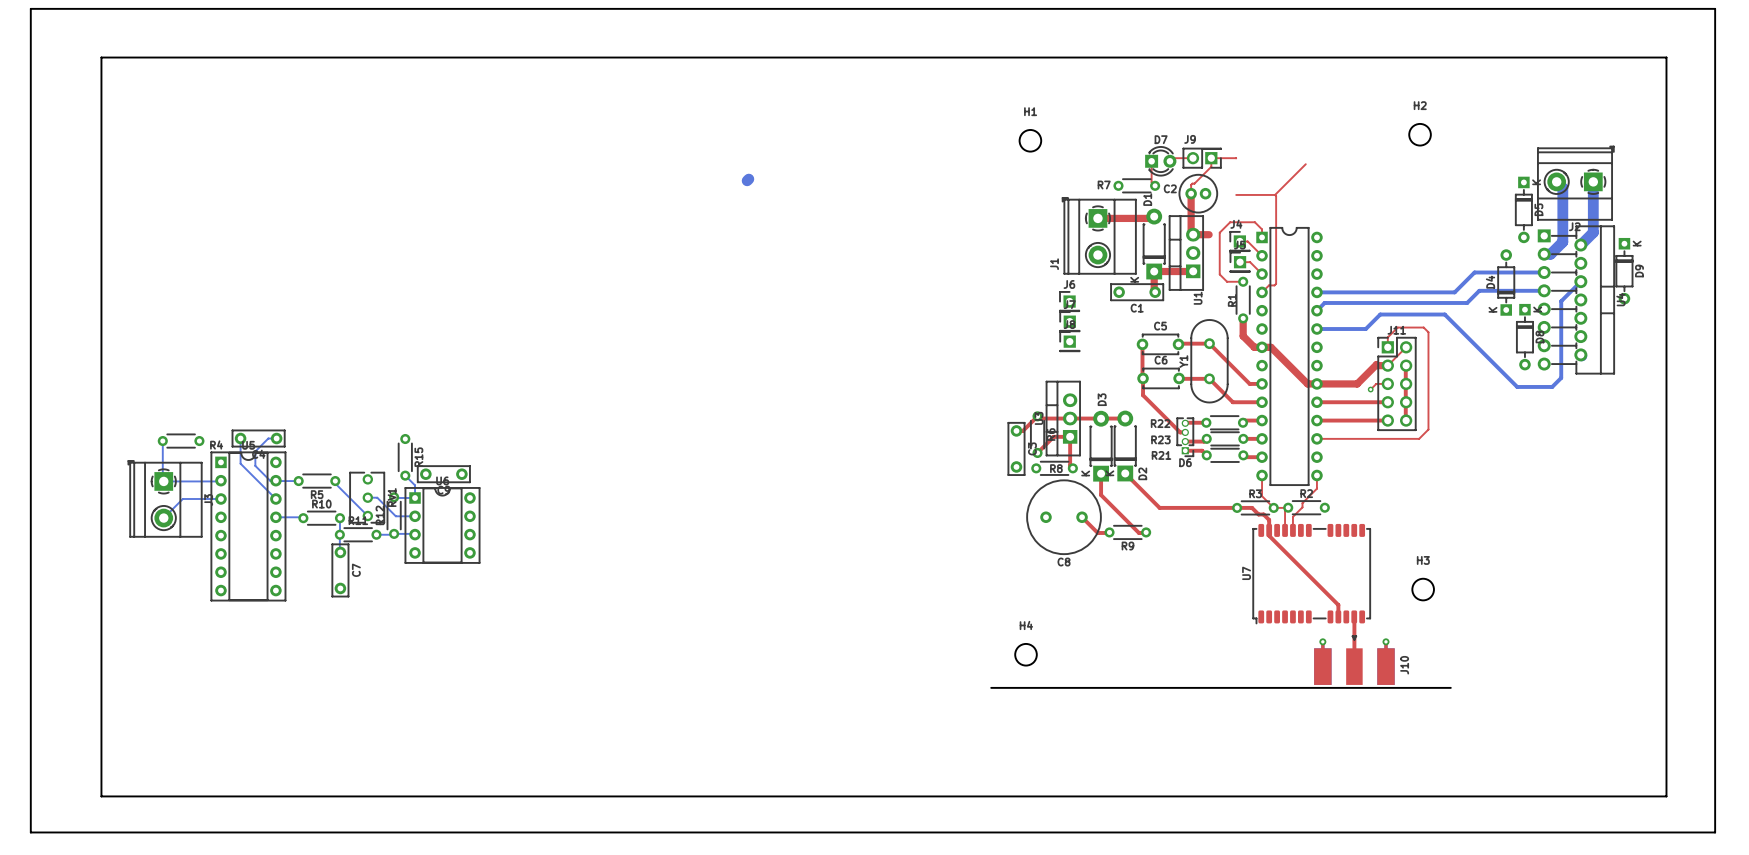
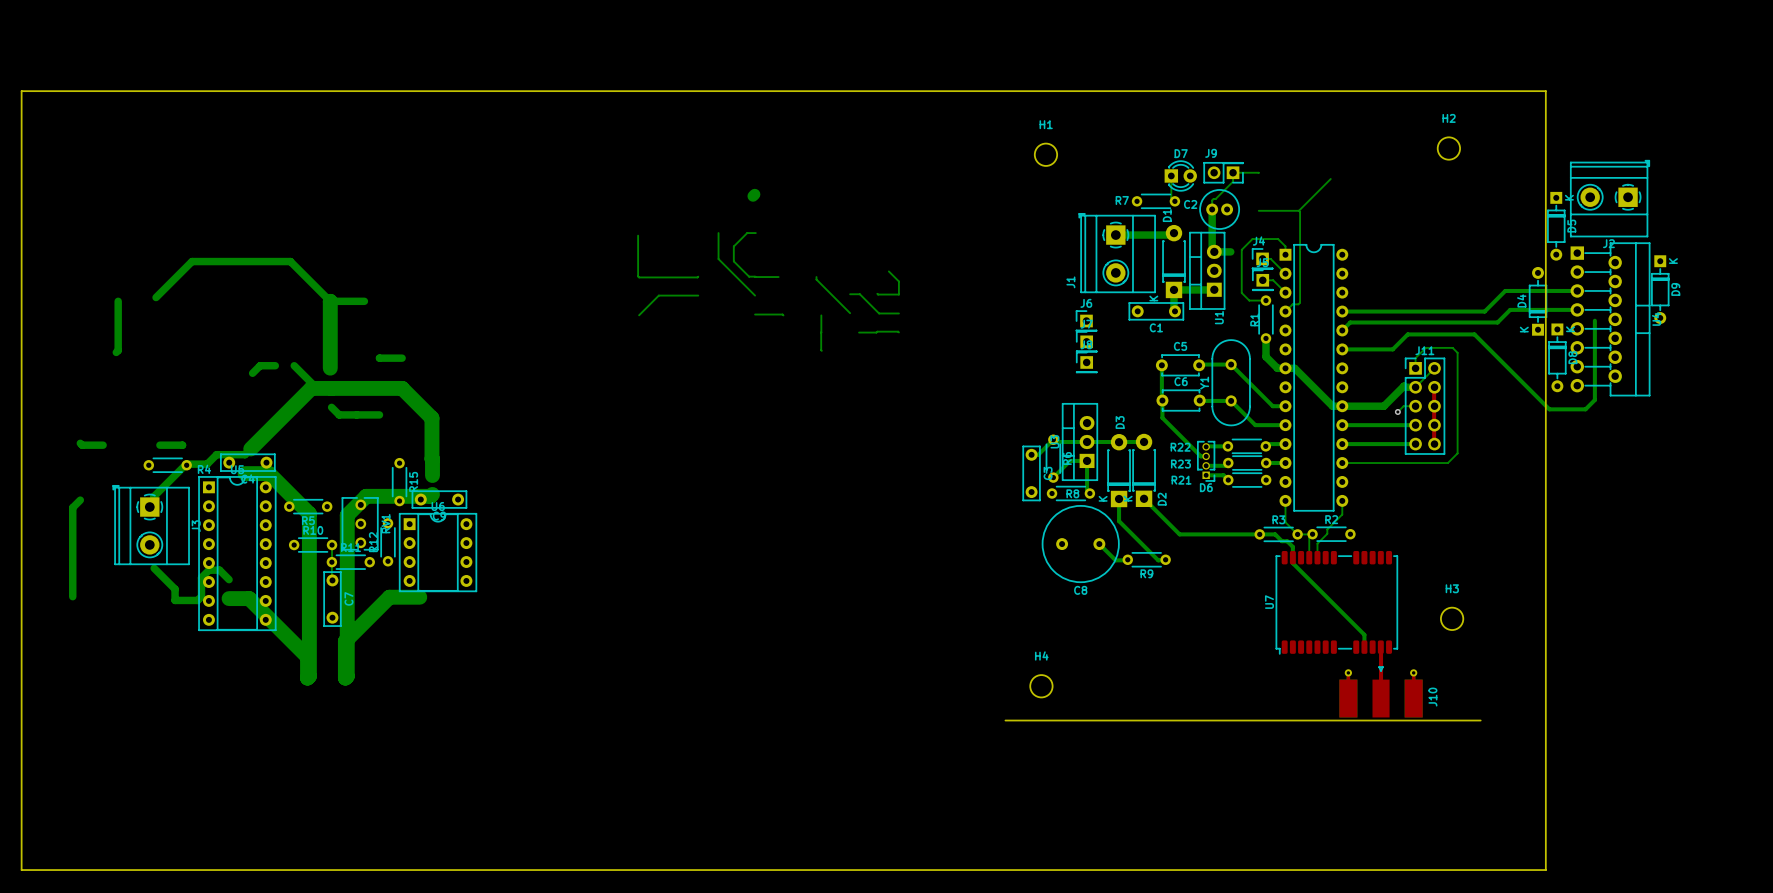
board edge: (101, 57) (1666, 57) (1666, 796) (101, 796) (101, 57) -> none
top track: (1193, 158) (1173, 158) (1169, 161) -> none
top track: (1236, 158) (1211, 158) (1211, 166) (1191, 184) (1191, 232) (1193, 234) (1209, 234) -> none
bottom track: none -> (1258, 172) (1233, 172) (1233, 181) (1212, 200) (1212, 249) (1214, 251) (1230, 251)
top track: (1151, 161) (1151, 182) (1155, 185) -> none
bottom track: none -> (1171, 175) (1171, 197) (1174, 201)
top track: (1305, 164) (1275, 194) -> none
bottom track: none -> (1330, 179) (1298, 210)
bottom track: (1556, 181) (1562, 188) (1562, 242) (1550, 254) (1544, 254) -> none
bottom track: (1593, 181) (1593, 232) (1580, 245) -> none
top track: (1236, 194) (1275, 194) -> none
bottom track: none -> (1258, 210) (1298, 210)
top track: (1275, 194) (1276, 283) (1268, 285) (1262, 292) -> none
bottom track: none -> (1298, 210) (1300, 302) (1292, 304) (1285, 311)
bottom track: none -> (718, 233) (718, 259) (755, 295)
bottom track: none -> (755, 233) (747, 233) (733, 246) (733, 261) (749, 276) (778, 277)
top track: (1154, 216) (1152, 218) (1097, 218) -> none
bottom track: none -> (1173, 233) (1172, 235) (1115, 235)
bottom track: none -> (638, 235) (639, 277) (698, 276)
top track: (1262, 237) (1262, 229) (1254, 222) (1230, 222) (1219, 232) (1219, 274) (1227, 281) (1243, 281) -> none
bottom track: none -> (1285, 254) (1285, 246) (1278, 239) (1252, 239) (1241, 249) (1241, 292) (1249, 300) (1265, 300)
top track: (1239, 241) (1247, 241) (1262, 255) -> none
bottom track: none -> (1262, 258) (1270, 258) (1285, 273)
bottom track: none -> (888, 271) (898, 281) (898, 294) (877, 293)
bottom track: none -> (816, 277) (816, 279) (850, 313)
top track: (1240, 262) (1250, 262) (1262, 274) -> none
bottom track: none -> (1262, 280) (1273, 280) (1285, 292)
top track: (1193, 271) (1154, 271) (1155, 292) -> none
bottom track: none -> (1214, 289) (1173, 289) (1174, 311)
bottom track: none -> (850, 294) (859, 294) (879, 313) (898, 313)
bottom track: none -> (698, 295) (658, 295) (639, 315)
bottom track: none -> (156, 297) (192, 261) (290, 261) (330, 301) (364, 301)
bottom track: (1580, 281) (1561, 301) -> none
bottom track: none -> (118, 301) (118, 350) (116, 352)
bottom track: none -> (330, 301) (330, 368)
bottom track: none -> (755, 314) (783, 315)
bottom track: none -> (821, 315) (821, 350)
bottom track: none -> (898, 332) (859, 332)
top track: (1243, 318) (1243, 336) (1254, 347) (1271, 347) (1307, 383) (1357, 383) (1376, 364) (1387, 365) (1406, 347) -> none
bottom track: none -> (1265, 338) (1265, 356) (1277, 368) (1294, 368) (1332, 406) (1383, 406) (1404, 386) (1415, 387) (1434, 368)
bottom track: none -> (379, 358) (402, 358)
bottom track: none -> (275, 365) (260, 365) (252, 373)
bottom track: none -> (294, 365) (316, 388) (331, 388)
top track: (1142, 344) (1143, 395) (1180, 432) (1185, 432) -> none
bottom track: none -> (1161, 365) (1162, 417) (1200, 456) (1206, 456)
top track: (1178, 344) (1209, 343) (1249, 383) (1262, 383) -> none
bottom track: none -> (1199, 365) (1231, 364) (1272, 406) (1285, 406)
top track: (1387, 347) (1387, 337) (1397, 327) (1423, 327) (1428, 332) (1428, 429) (1419, 438) (1316, 438) -> none
bottom track: none -> (1415, 368) (1415, 358) (1425, 347) (1452, 347) (1457, 352) (1457, 453) (1447, 463) (1342, 463)
top track: (1179, 378) (1209, 378) (1232, 402) (1262, 402) -> none
bottom track: none -> (1199, 400) (1231, 400) (1255, 425) (1285, 425)
top track: (1387, 383) (1376, 383) (1370, 389) -> none
bottom track: none -> (1415, 406) (1403, 406) (1397, 412)
bottom track: none -> (331, 407) (339, 414) (379, 414)
top track: (1316, 402) (1387, 403) -> none
bottom track: none -> (1342, 425) (1415, 426)
top track: (1125, 418) (1039, 418) (1037, 416) (1022, 430) (1016, 430) -> none
bottom track: none -> (1144, 442) (1055, 442) (1053, 439) (1038, 454) (1031, 454)
bottom track: none -> (80, 443) (82, 445) (103, 445)
top track: (1262, 420) (1245, 420) (1242, 422) -> none
bottom track: none -> (1285, 444) (1268, 444) (1265, 446)
top track: (1316, 420) (1387, 421) -> none
bottom track: none -> (1342, 444) (1415, 445)
bottom track: none -> (159, 445) (182, 445)
top track: (1206, 422) (1185, 423) -> none
bottom track: none -> (1227, 446) (1206, 446)
bottom track: (240, 438) (240, 463) (275, 498) -> none
bottom track: (276, 438) (268, 438) (255, 451) (255, 465) (270, 480) (298, 481) -> none
top track: (1206, 438) (1204, 441) (1185, 441) -> none
bottom track: none -> (1228, 463) (1225, 465) (1206, 465)
top track: (1243, 438) (1262, 438) -> none
bottom track: none -> (1266, 463) (1285, 463)
bottom track: (162, 441) (163, 481) (220, 480) -> none
bottom track: none -> (245, 473) (269, 473) (309, 513) (309, 676) (307, 678) (307, 656) (249, 598) (229, 598)
bottom track: none -> (432, 475) (431, 418) (402, 388) (311, 388) (245, 454) (216, 454) (207, 464) (186, 464) (154, 496) (154, 511)
top track: (1185, 450) (1202, 450) (1206, 455) -> none
bottom track: none -> (1206, 475) (1223, 475) (1228, 480)
top track: (1037, 452) (1053, 436) (1070, 436) (1070, 465) (1072, 468) -> none
bottom track: none -> (1053, 477) (1070, 460) (1087, 460) (1087, 490) (1089, 493)
top track: (1243, 455) (1245, 457) (1262, 457) -> none
bottom track: none -> (432, 494) (430, 496) (366, 496) (347, 515) (347, 676) (345, 678) (345, 641) (389, 597) (419, 597)
top track: (1101, 473) (1101, 495) (1138, 532) (1146, 532) -> none
bottom track: none -> (1119, 498) (1119, 521) (1158, 560) (1165, 559)
top track: (1125, 473) (1159, 507) (1252, 507) (1258, 514) (1263, 514) (1269, 519) (1269, 535) (1338, 605) (1338, 616) -> none
bottom track: none -> (1144, 498) (1179, 534) (1275, 534) (1281, 541) (1287, 541) (1292, 546) (1292, 563) (1364, 634) (1364, 647)
bottom track: none -> (80, 500) (72, 507) (72, 596)
bottom track: (405, 475) (415, 485) (415, 497) (394, 497) -> none
top track: (1262, 475) (1262, 496) (1273, 507) (1288, 507) -> none
bottom track: none -> (1285, 500) (1285, 522) (1297, 534) (1312, 534)
top track: (1316, 475) (1316, 488) (1302, 503) (1302, 507) (1292, 516) (1292, 530) -> none
bottom track: none -> (1342, 500) (1342, 514) (1327, 529) (1327, 533) (1317, 543) (1317, 557)
bottom track: (335, 481) (335, 483) (367, 516) -> none
bottom track: (367, 497) (377, 497) (395, 516) (415, 516) -> none
bottom track: (220, 498) (182, 498) (163, 518) -> none
top track: (1288, 507) (1285, 510) (1285, 530) -> none
bottom track: none -> (1312, 534) (1309, 537) (1309, 557)
bottom track: (275, 517) (303, 518) -> none
top track: (1082, 517) (1097, 532) (1109, 532) -> none
bottom track: none -> (1099, 544) (1115, 560) (1127, 559)
bottom track: (415, 534) (376, 534) -> none
bottom track: none -> (154, 568) (175, 589) (175, 600) (197, 600) (201, 596) (201, 577) (209, 570) (219, 570) (229, 579)
board edge: (39, 832) (30, 832) (30, 8) (1715, 8) (1715, 832) (1513, 832) -> (21, 870) (21, 91) (1545, 91) (1545, 870)

